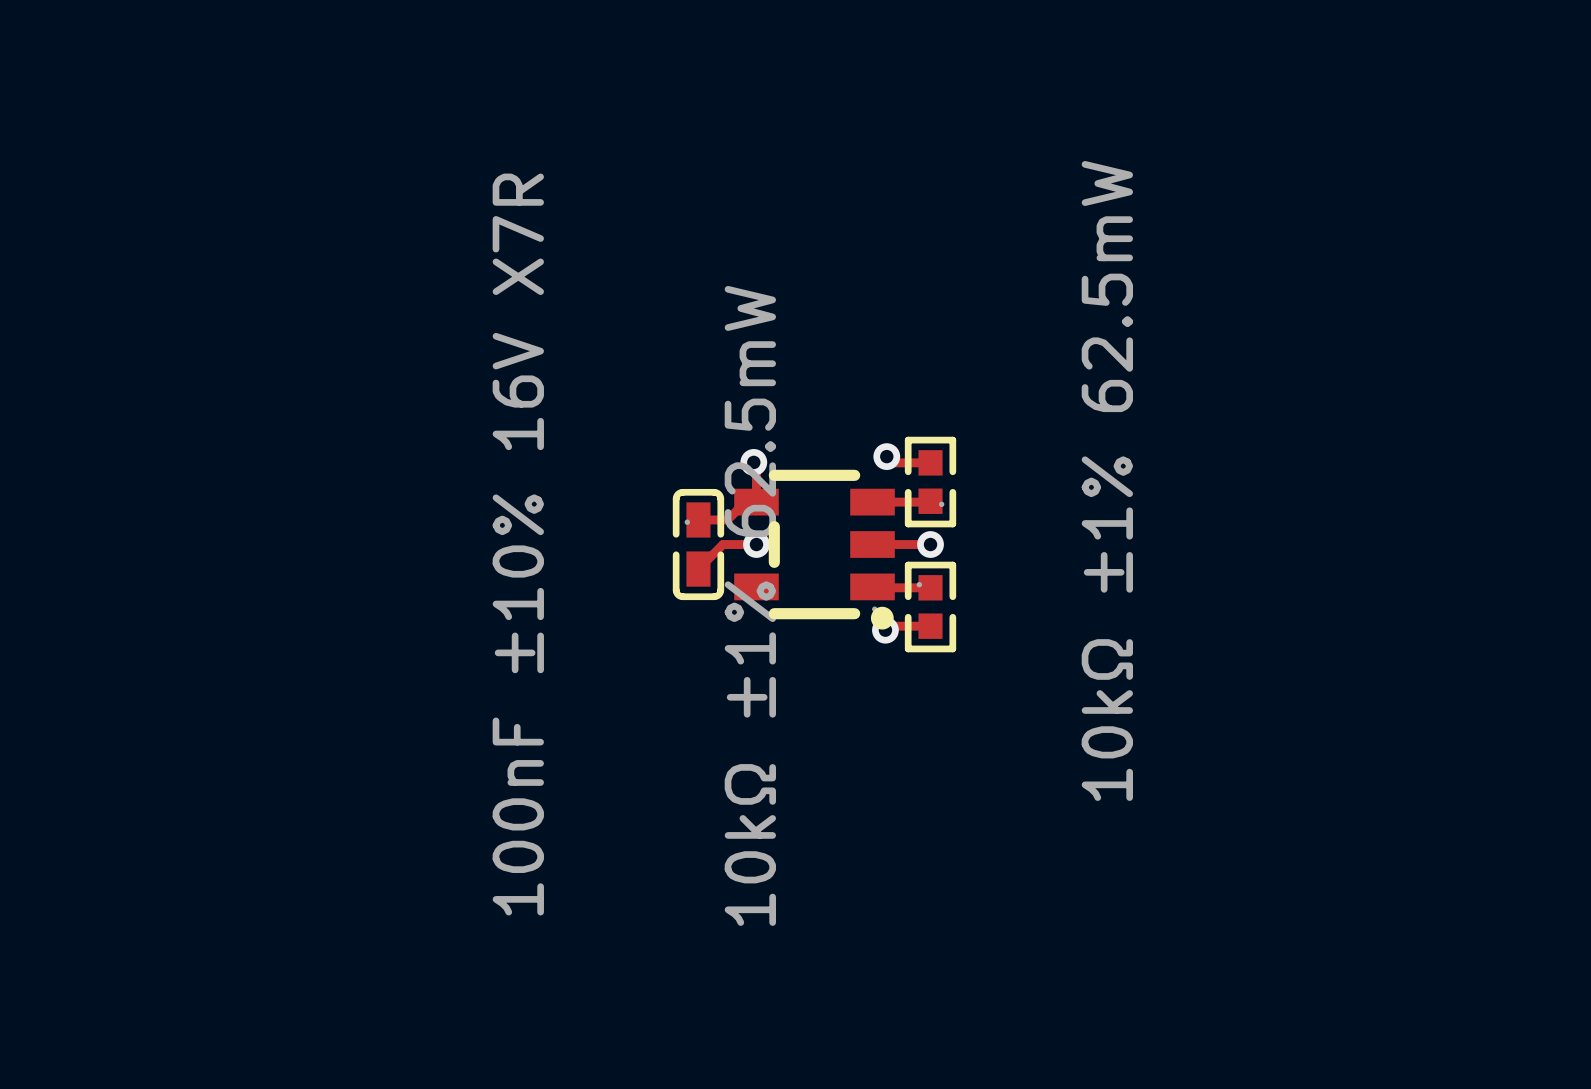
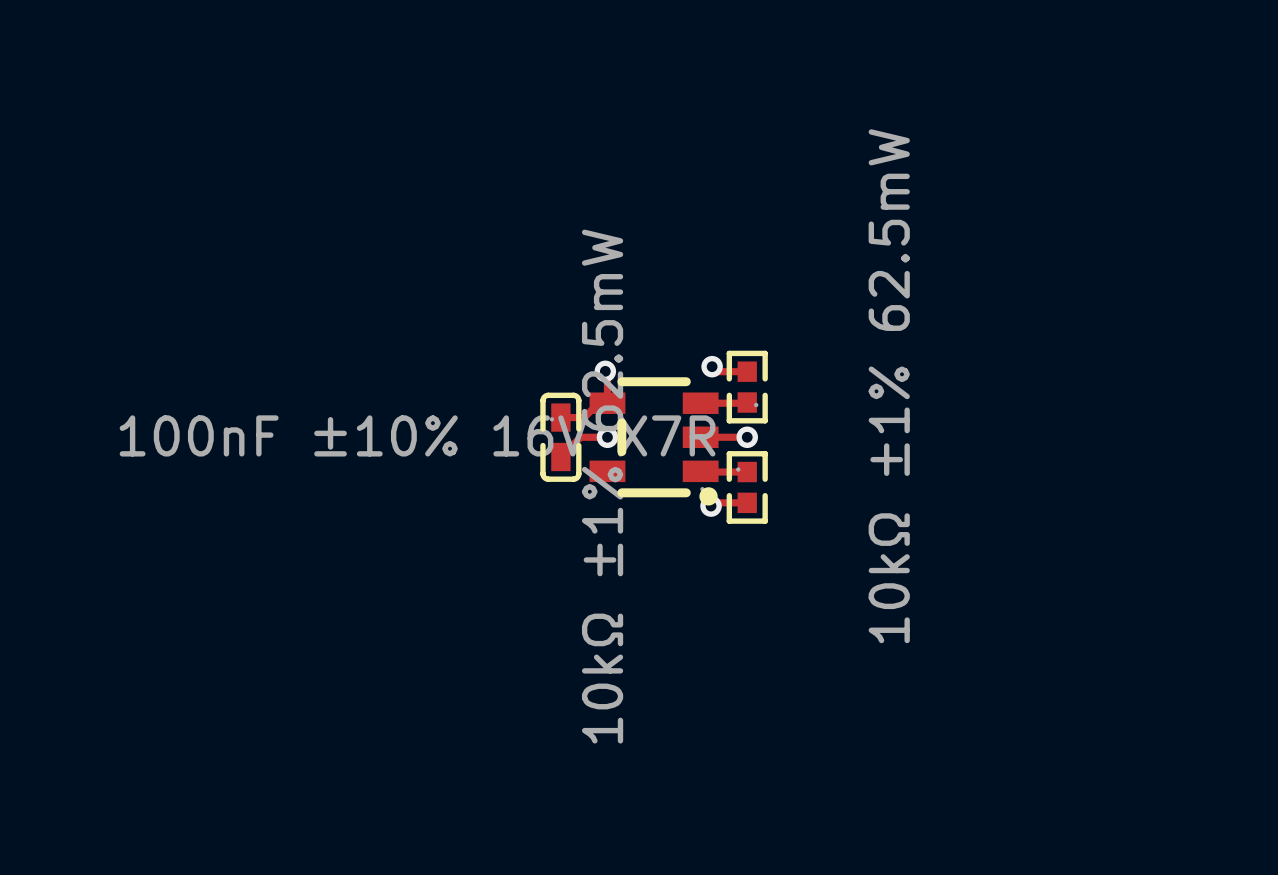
part value rotation: 0° (518, 544) -> 90° clockwise (417, 435)

